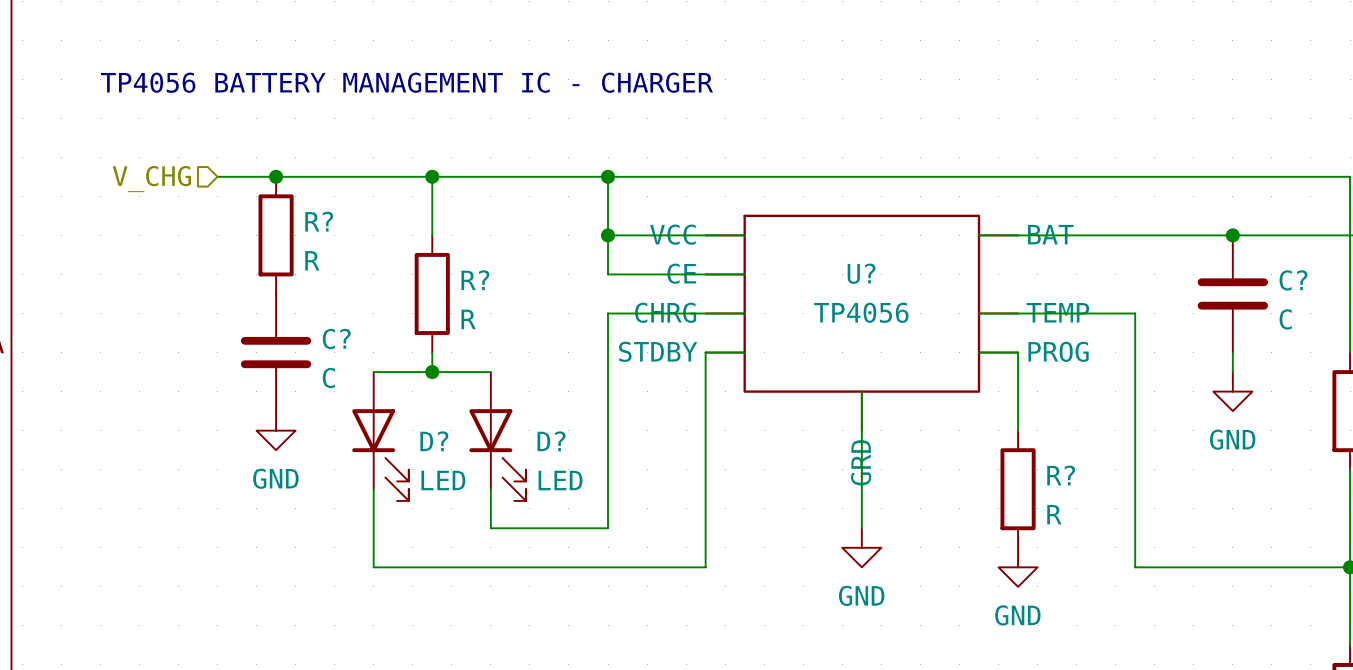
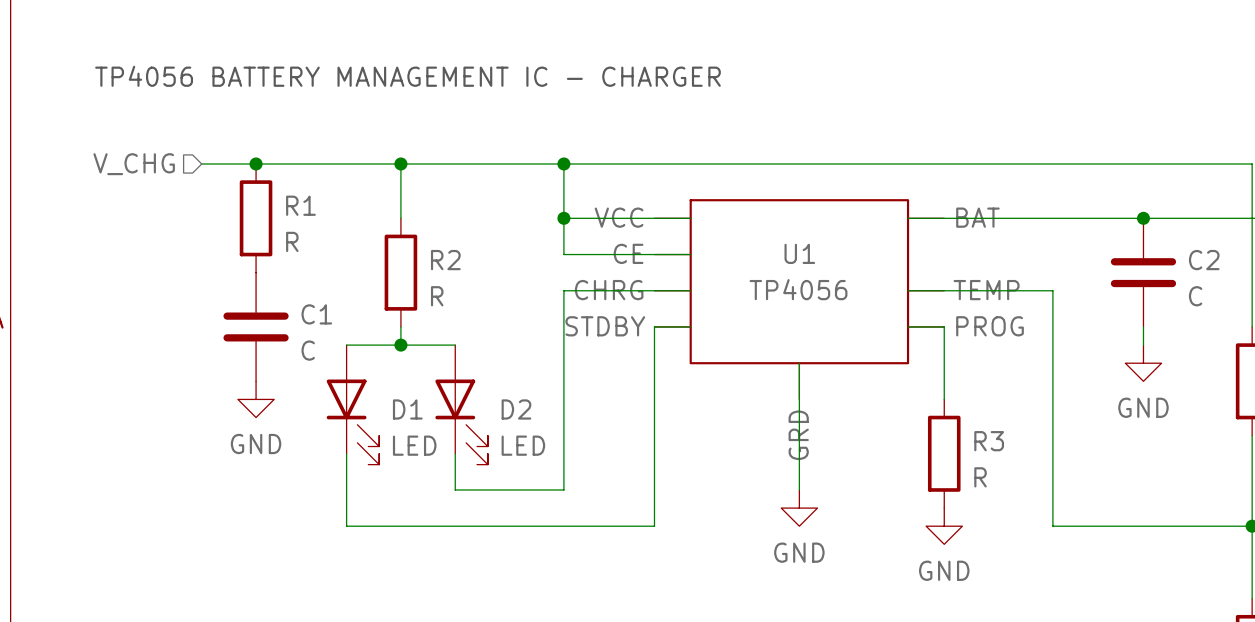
R? name: R? (319, 221) -> R1 (300, 205)
U? name: U? (861, 273) -> U1 (799, 253)
R? name: R? (475, 280) -> R2 (445, 260)
C? name: C? (1293, 280) -> C2 (1204, 260)
C? name: C? (336, 338) -> C1 (316, 314)
D? name: D? (434, 441) -> D1 (407, 409)
D? name: D? (551, 441) -> D2 (516, 409)
R? name: R? (1061, 475) -> R3 (989, 441)

